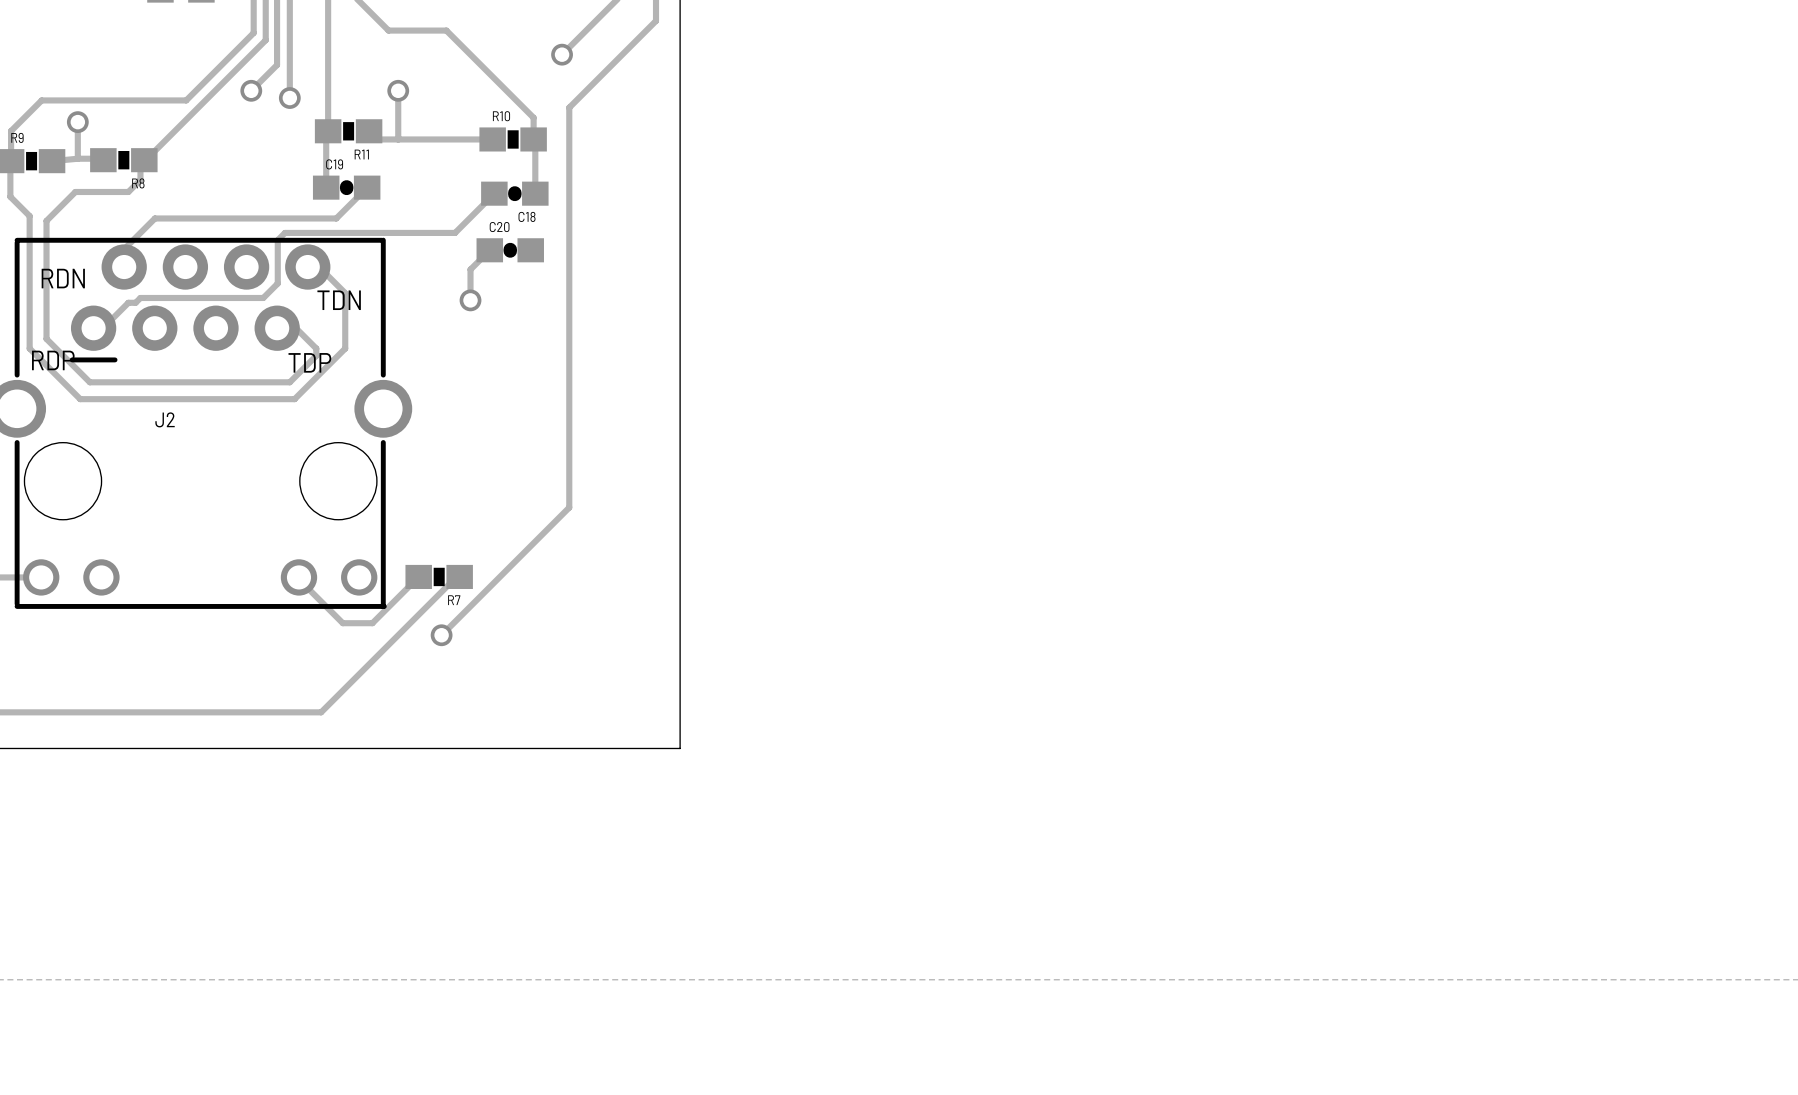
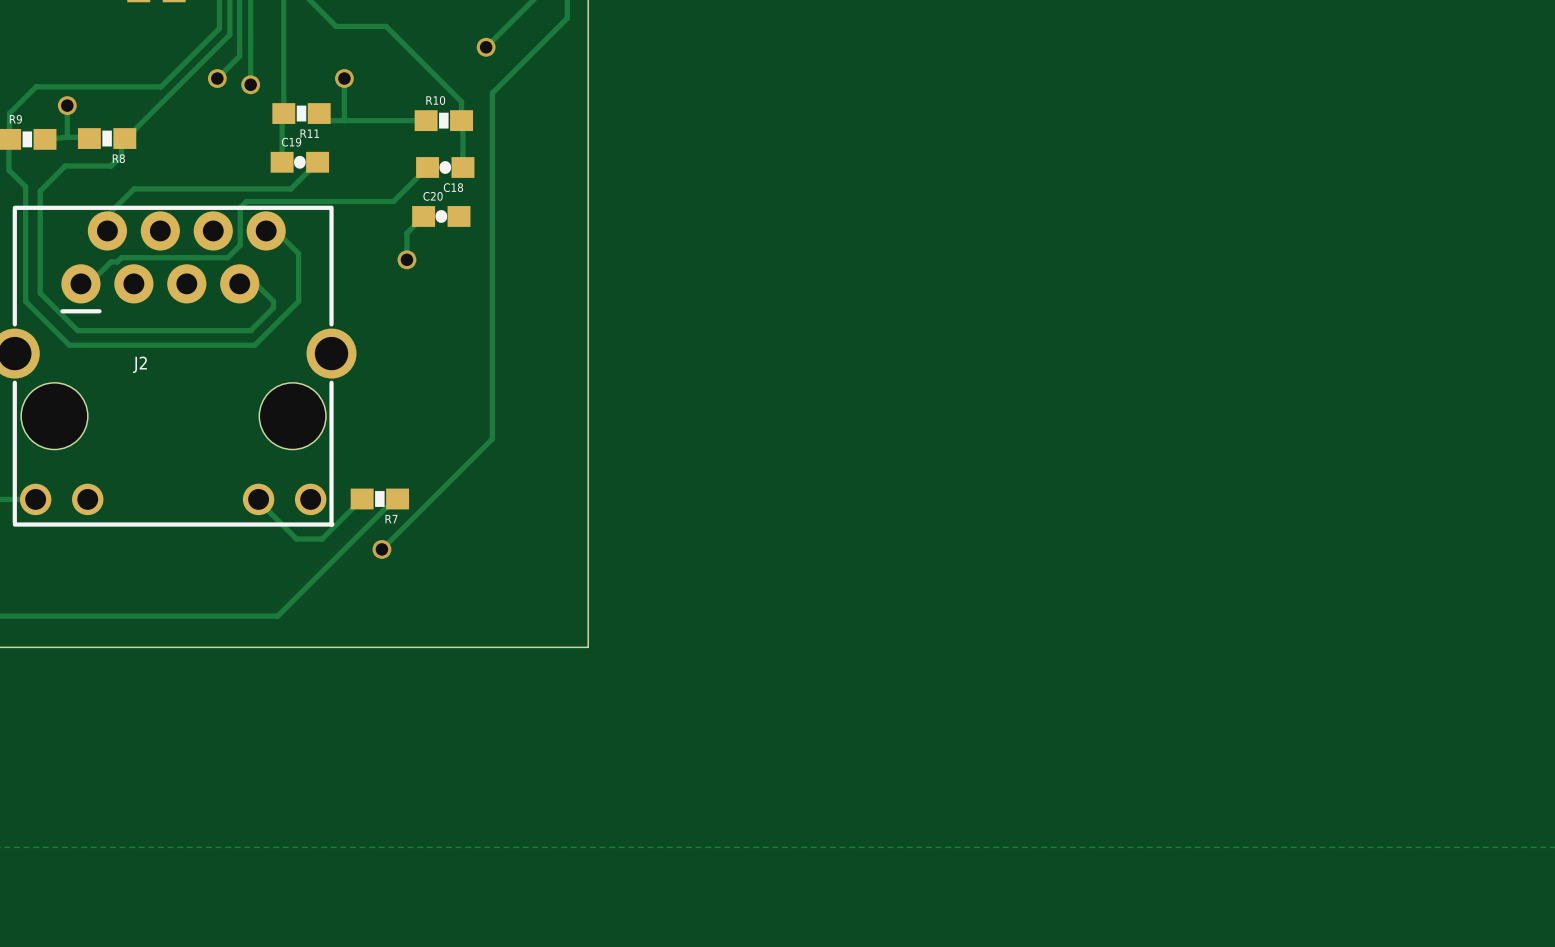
text: RDN (63, 278) -> none
text: TDN (339, 300) -> none
text: RDP (53, 360) -> none
text: TDP (309, 362) -> none

